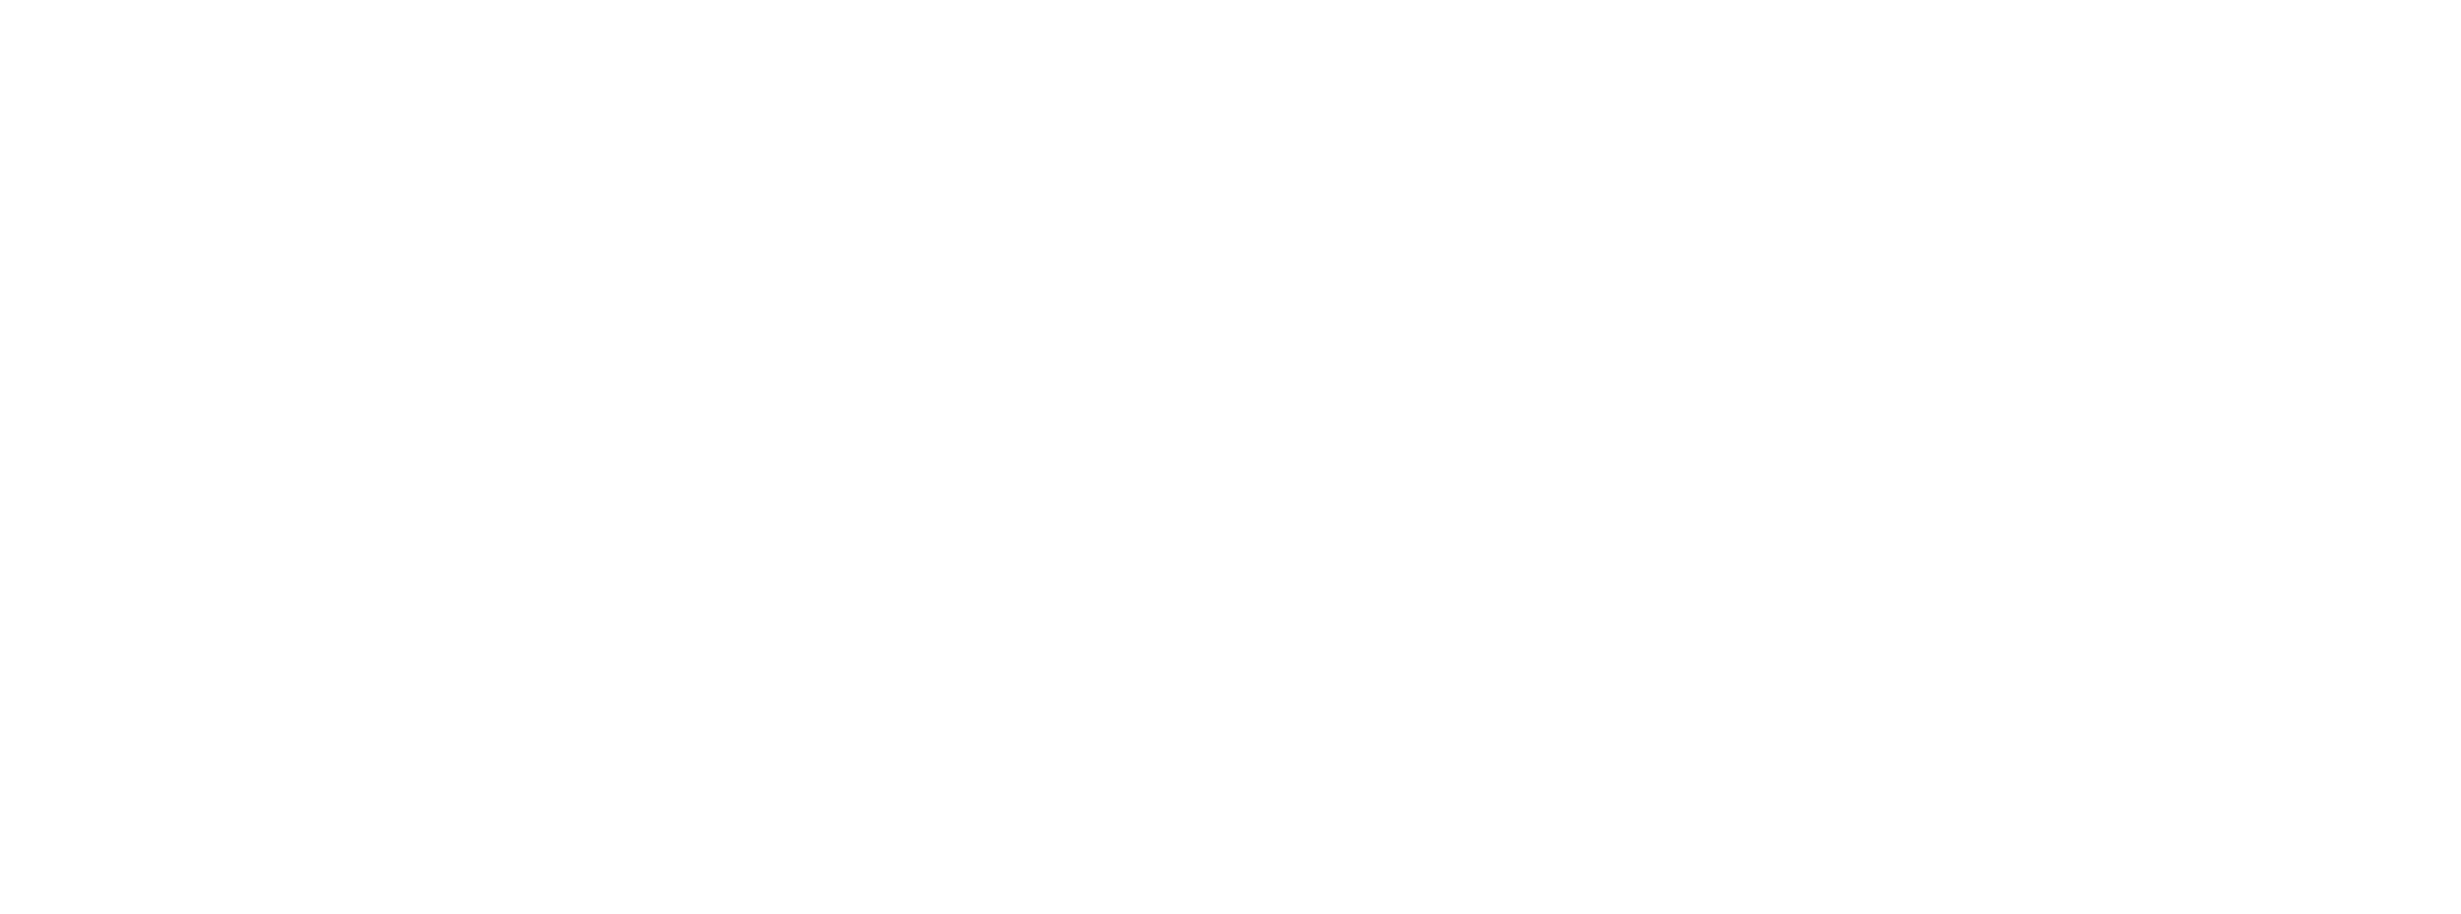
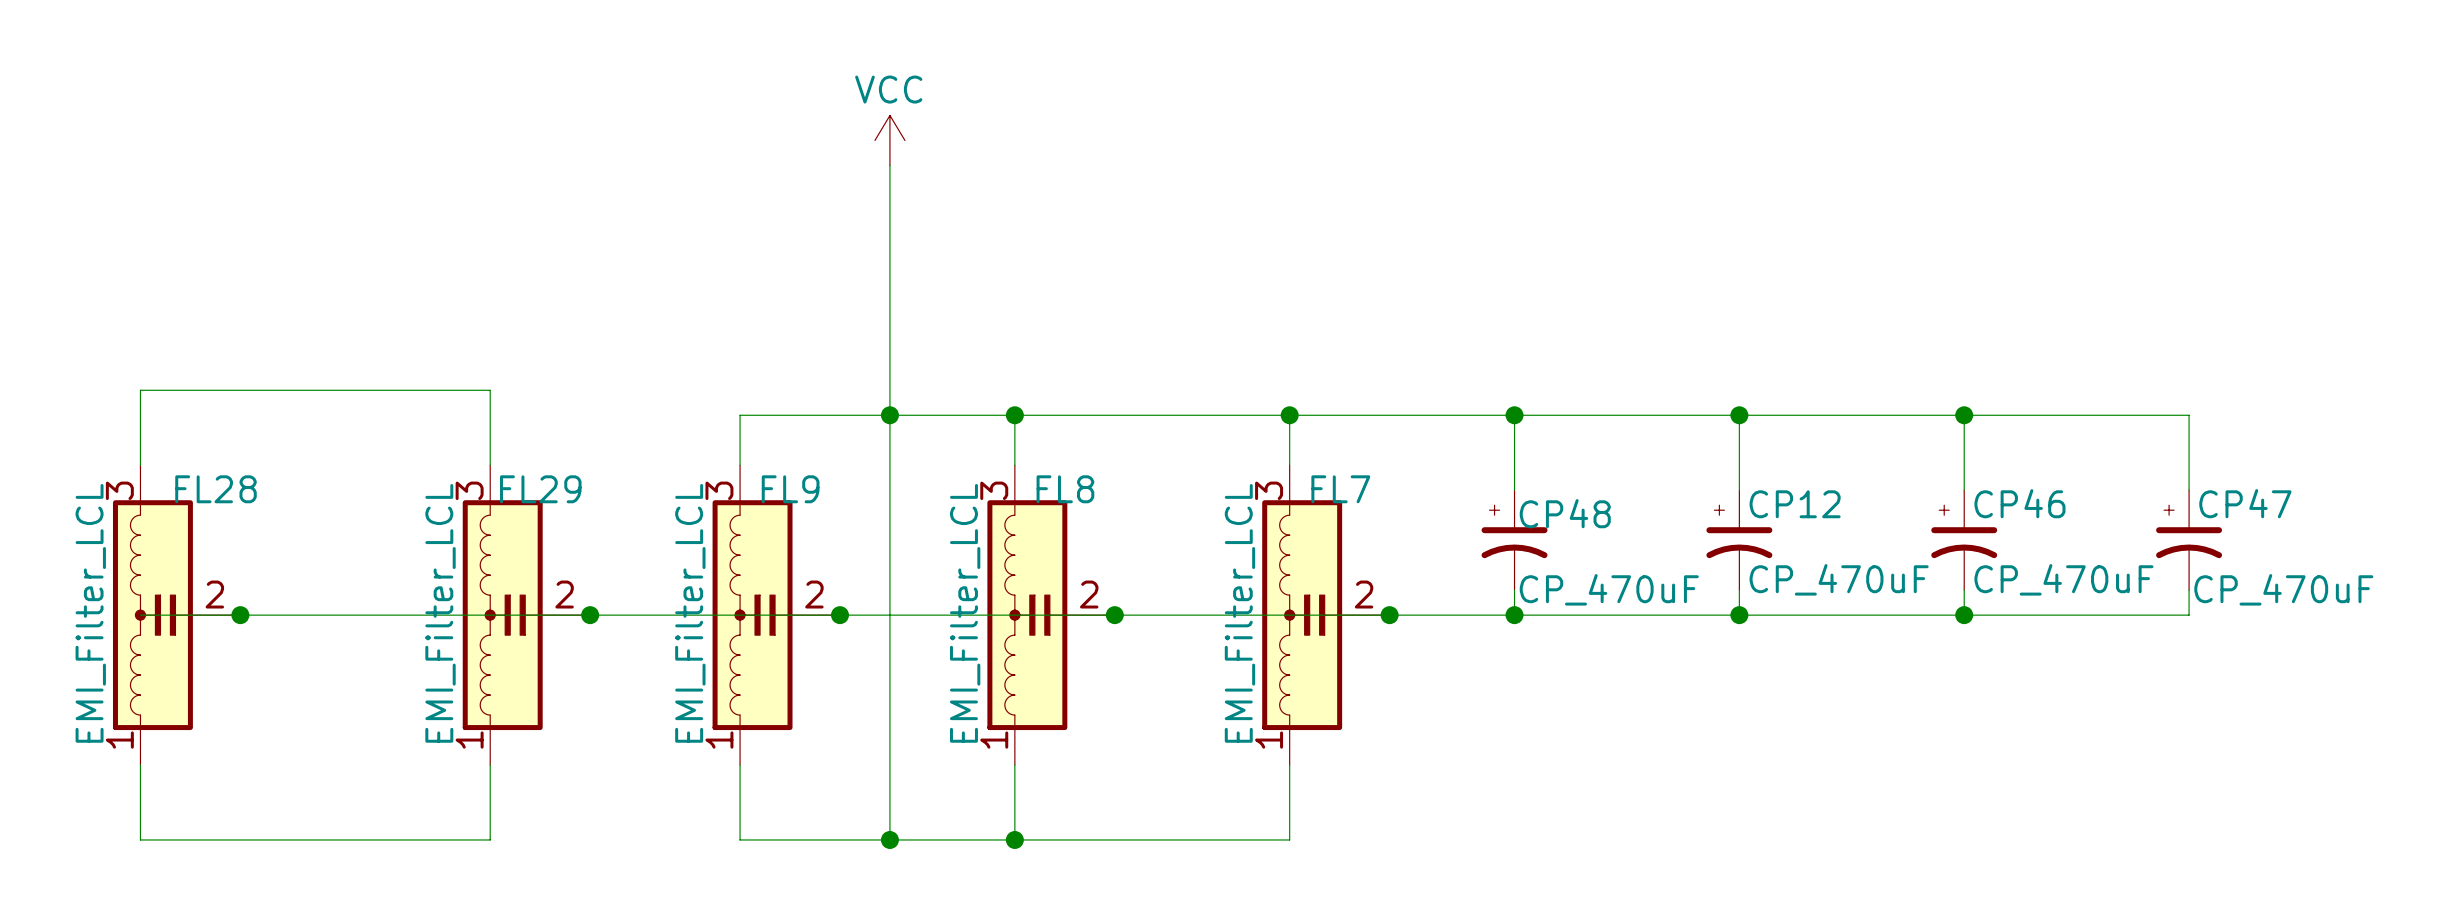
power symbol: none -> VCC (889, 140)
wire: none -> (889, 165) (889, 839)
junction: none -> (889, 415)
wire: none -> (1014, 415) (1014, 465)
junction: none -> (1014, 415)
wire: none -> (1289, 415) (1289, 465)
junction: none -> (1289, 415)
wire: none -> (1514, 415) (1514, 490)
junction: none -> (1514, 415)
wire: none -> (1739, 415) (1739, 490)
junction: none -> (1739, 415)
wire: none -> (1964, 415) (1964, 490)
junction: none -> (1964, 415)
wire: none -> (140, 465) (140, 390) (490, 390) (490, 465)
wire: none -> (740, 465) (740, 415) (2189, 415) (2189, 490)
CP48: none -> CP_470uF (1514, 540)
CP12: none -> CP_470uF (1739, 540)
CP46: none -> CP_470uF (1964, 540)
CP47: none -> CP_470uF (2189, 540)
wire: none -> (1514, 590) (1514, 615)
wire: none -> (1739, 590) (1739, 615)
wire: none -> (1964, 590) (1964, 615)
wire: none -> (2189, 590) (2189, 615) (140, 615)
FL28: none -> EMI_Filter_LCL (176, 615)
junction: none -> (240, 615)
FL29: none -> EMI_Filter_LCL (526, 615)
junction: none -> (590, 615)
FL9: none -> EMI_Filter_LCL (776, 615)
junction: none -> (839, 615)
FL8: none -> EMI_Filter_LCL (1051, 615)
junction: none -> (1114, 615)
FL7: none -> EMI_Filter_LCL (1325, 615)
junction: none -> (1389, 615)
junction: none -> (1514, 615)
junction: none -> (1739, 615)
junction: none -> (1964, 615)
wire: none -> (140, 765) (140, 839) (490, 839) (490, 765)
wire: none -> (740, 765) (740, 839) (1289, 839) (1289, 765)
wire: none -> (1014, 765) (1014, 839)
junction: none -> (889, 839)
junction: none -> (1014, 839)

